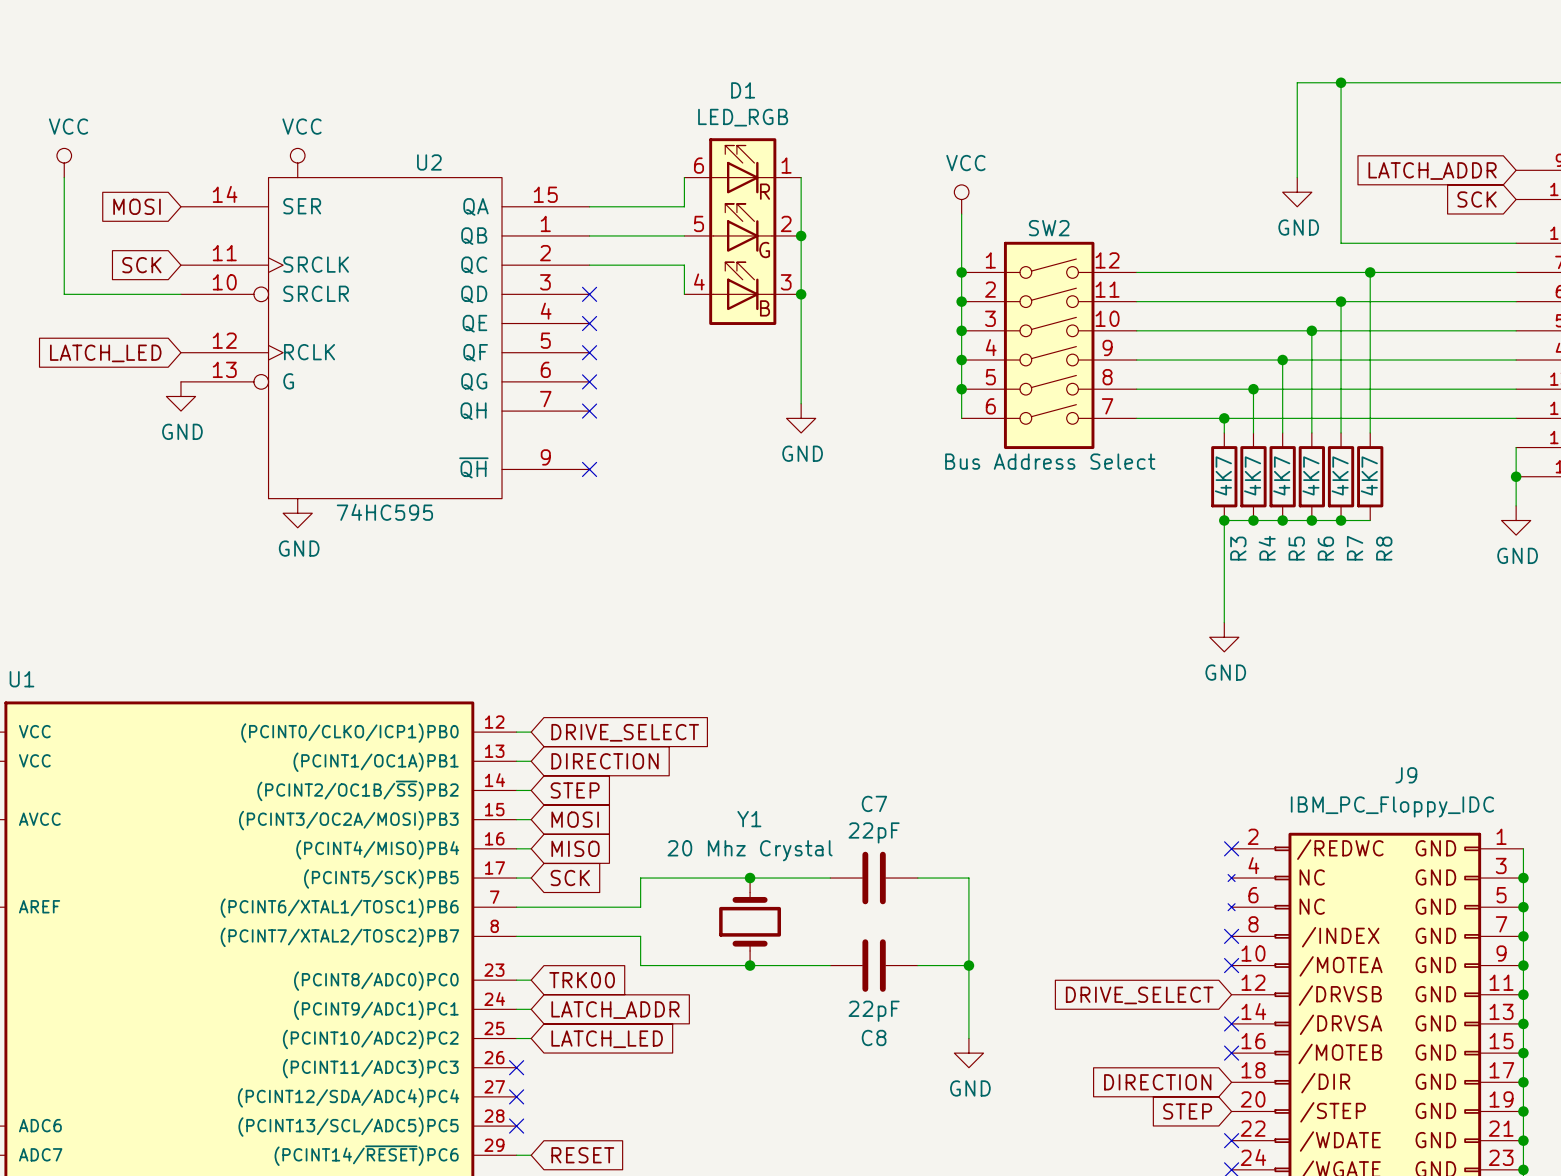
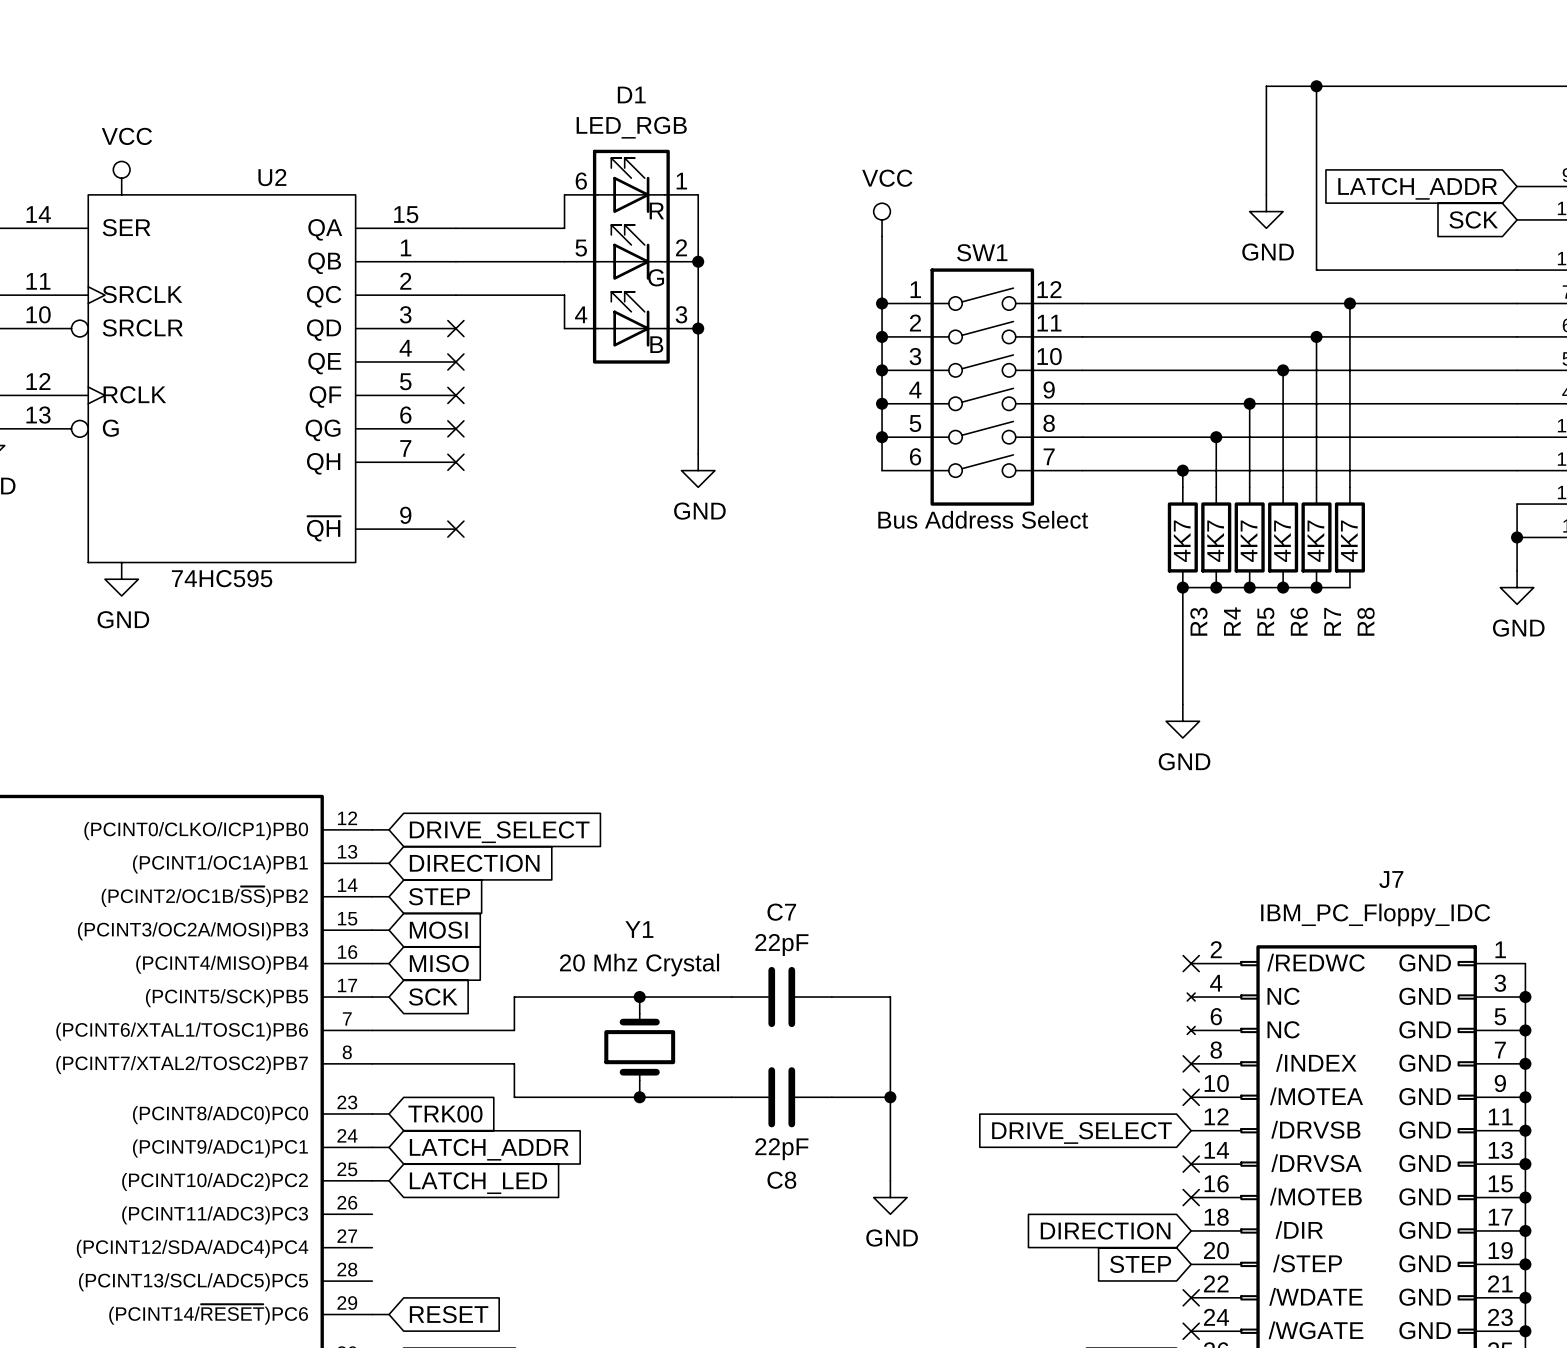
SW2 name: SW2 (1049, 228) -> SW1 (982, 252)
J9 name: J9 (1406, 775) -> J7 (1391, 879)
no-connect mark: (516, 1067) -> none
no-connect mark: (516, 1096) -> none
no-connect mark: (516, 1126) -> none

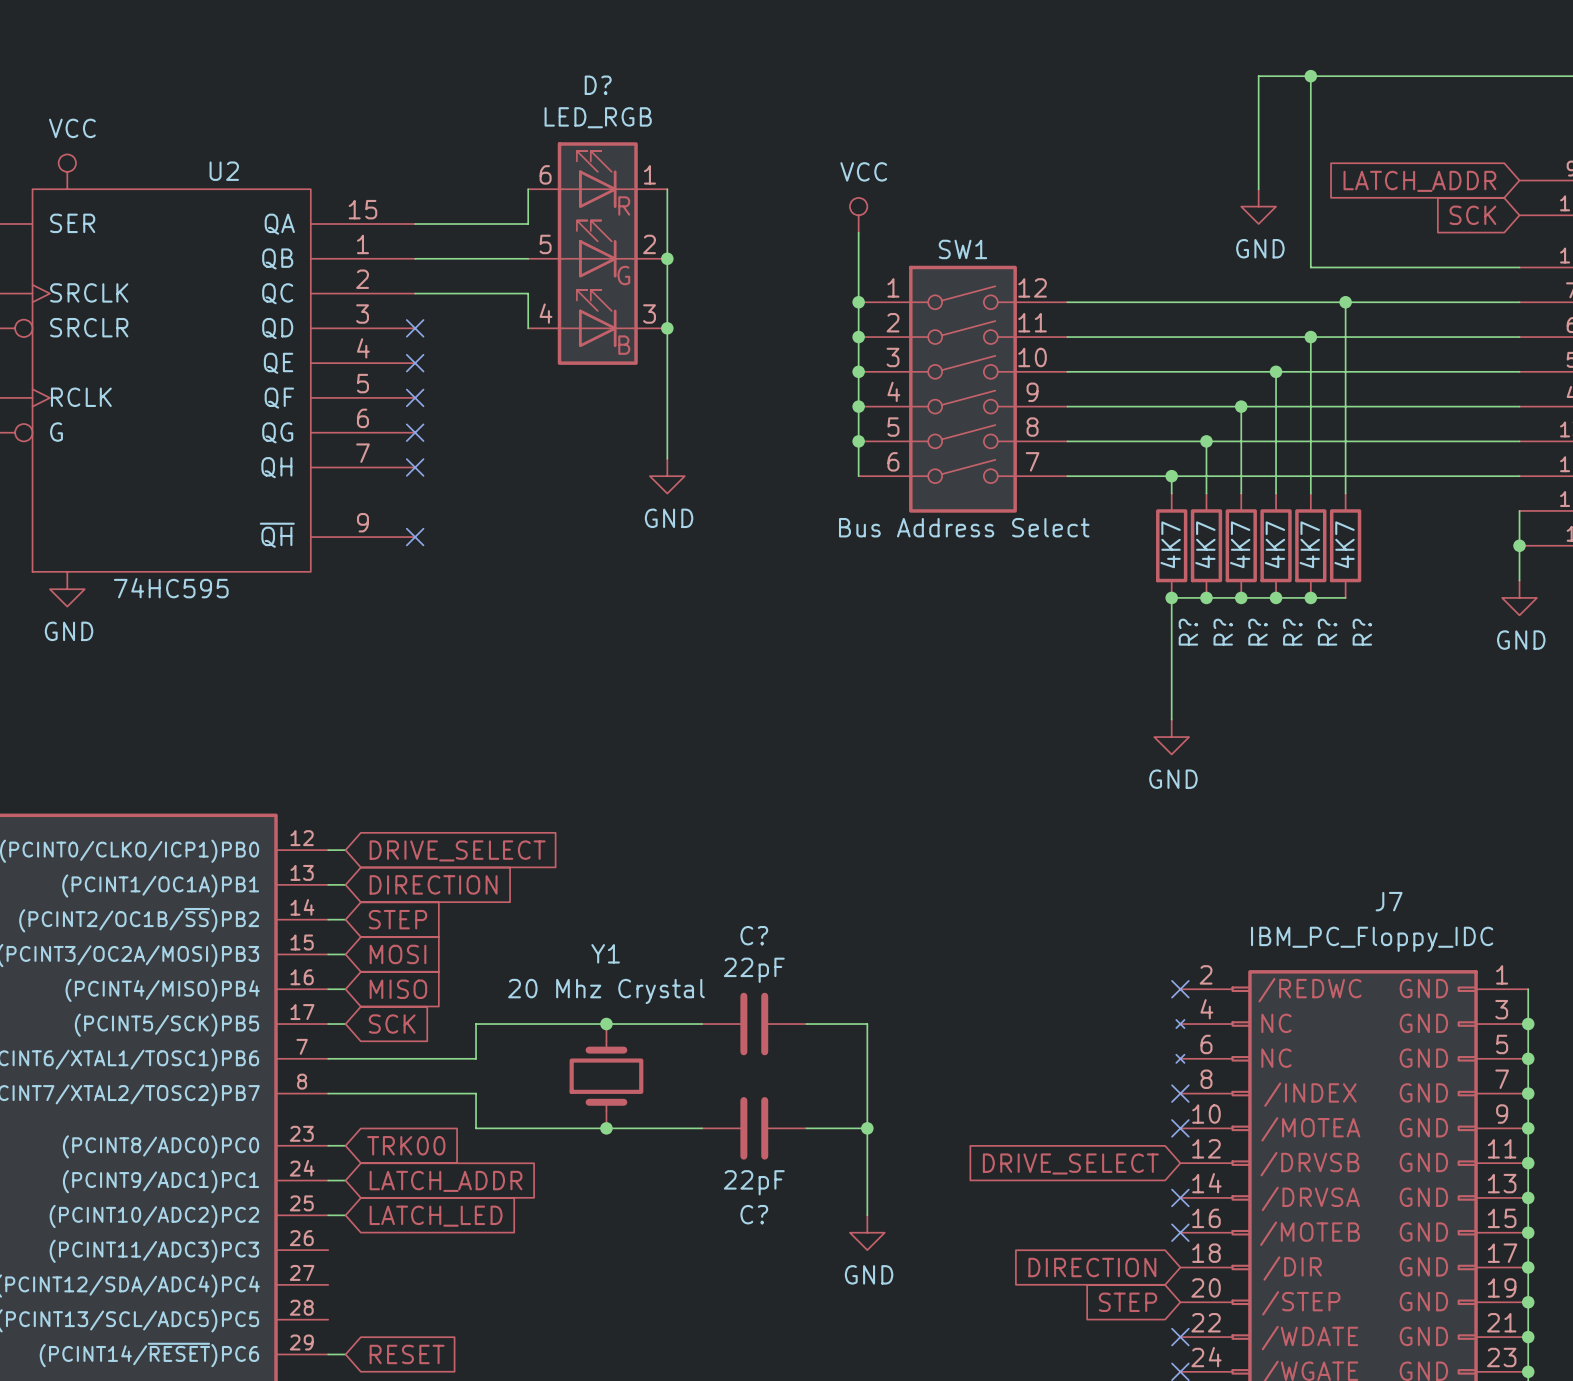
D1 name: D1 (631, 94) -> D? (598, 85)
R3 name: R3 (1198, 621) -> R? (1188, 632)
R4 name: R4 (1232, 621) -> R? (1223, 632)
R5 name: R5 (1265, 621) -> R? (1258, 632)
R6 name: R6 (1299, 621) -> R? (1292, 632)
R7 name: R7 (1332, 621) -> R? (1327, 632)
R8 name: R8 (1366, 621) -> R? (1362, 632)
C7 name: C7 (781, 912) -> C? (754, 935)
C8 name: C8 (781, 1180) -> C? (754, 1214)

